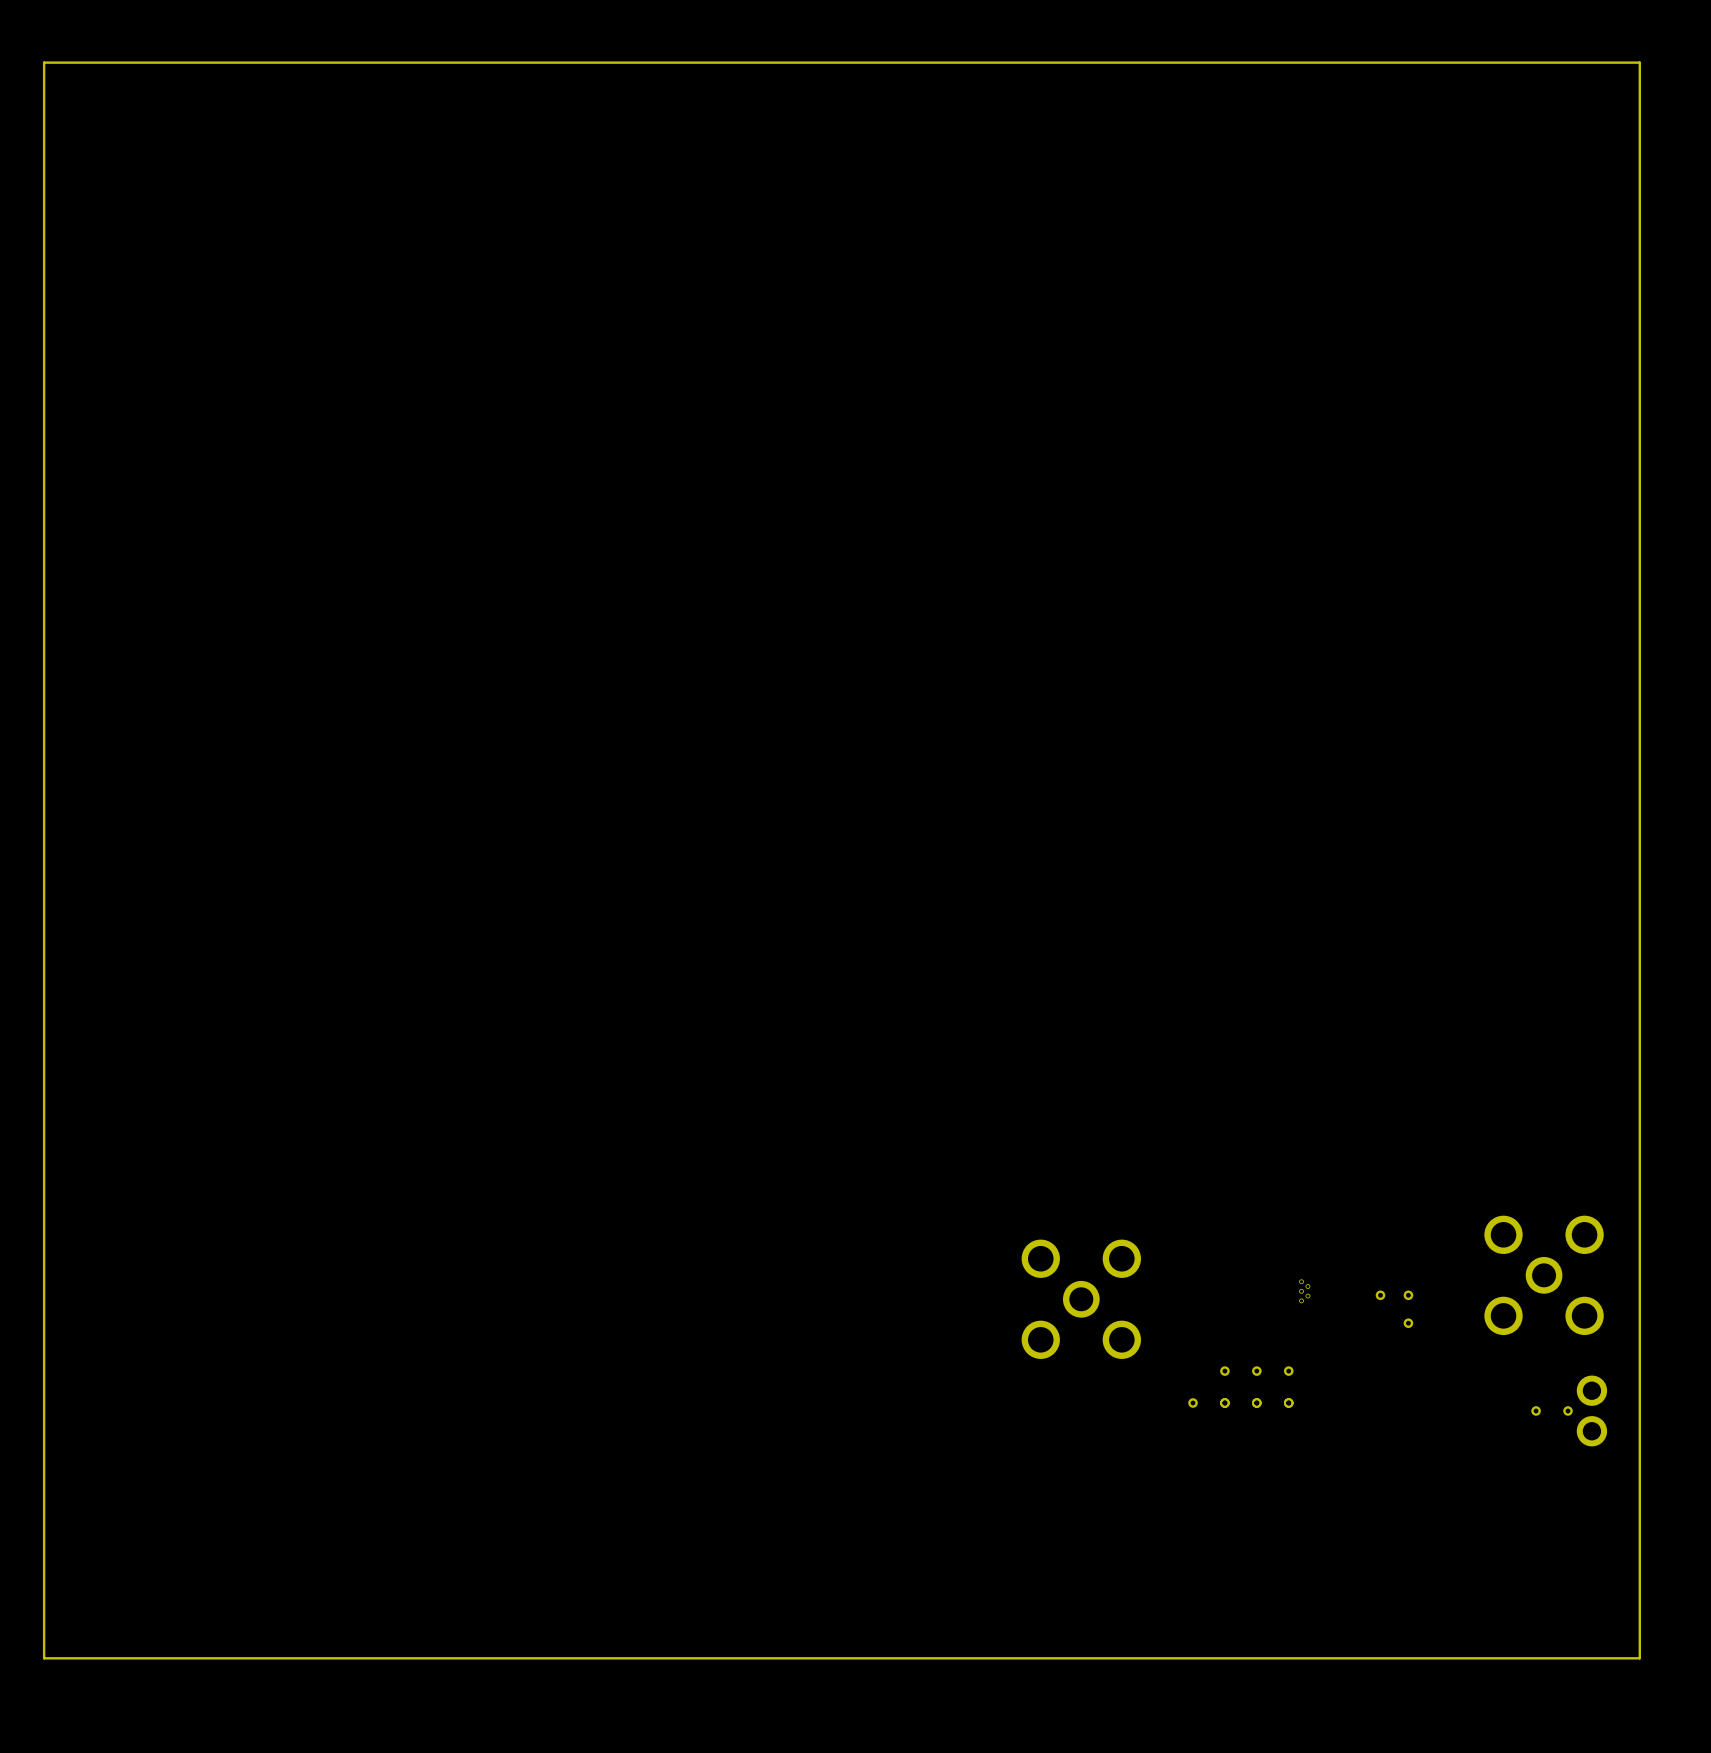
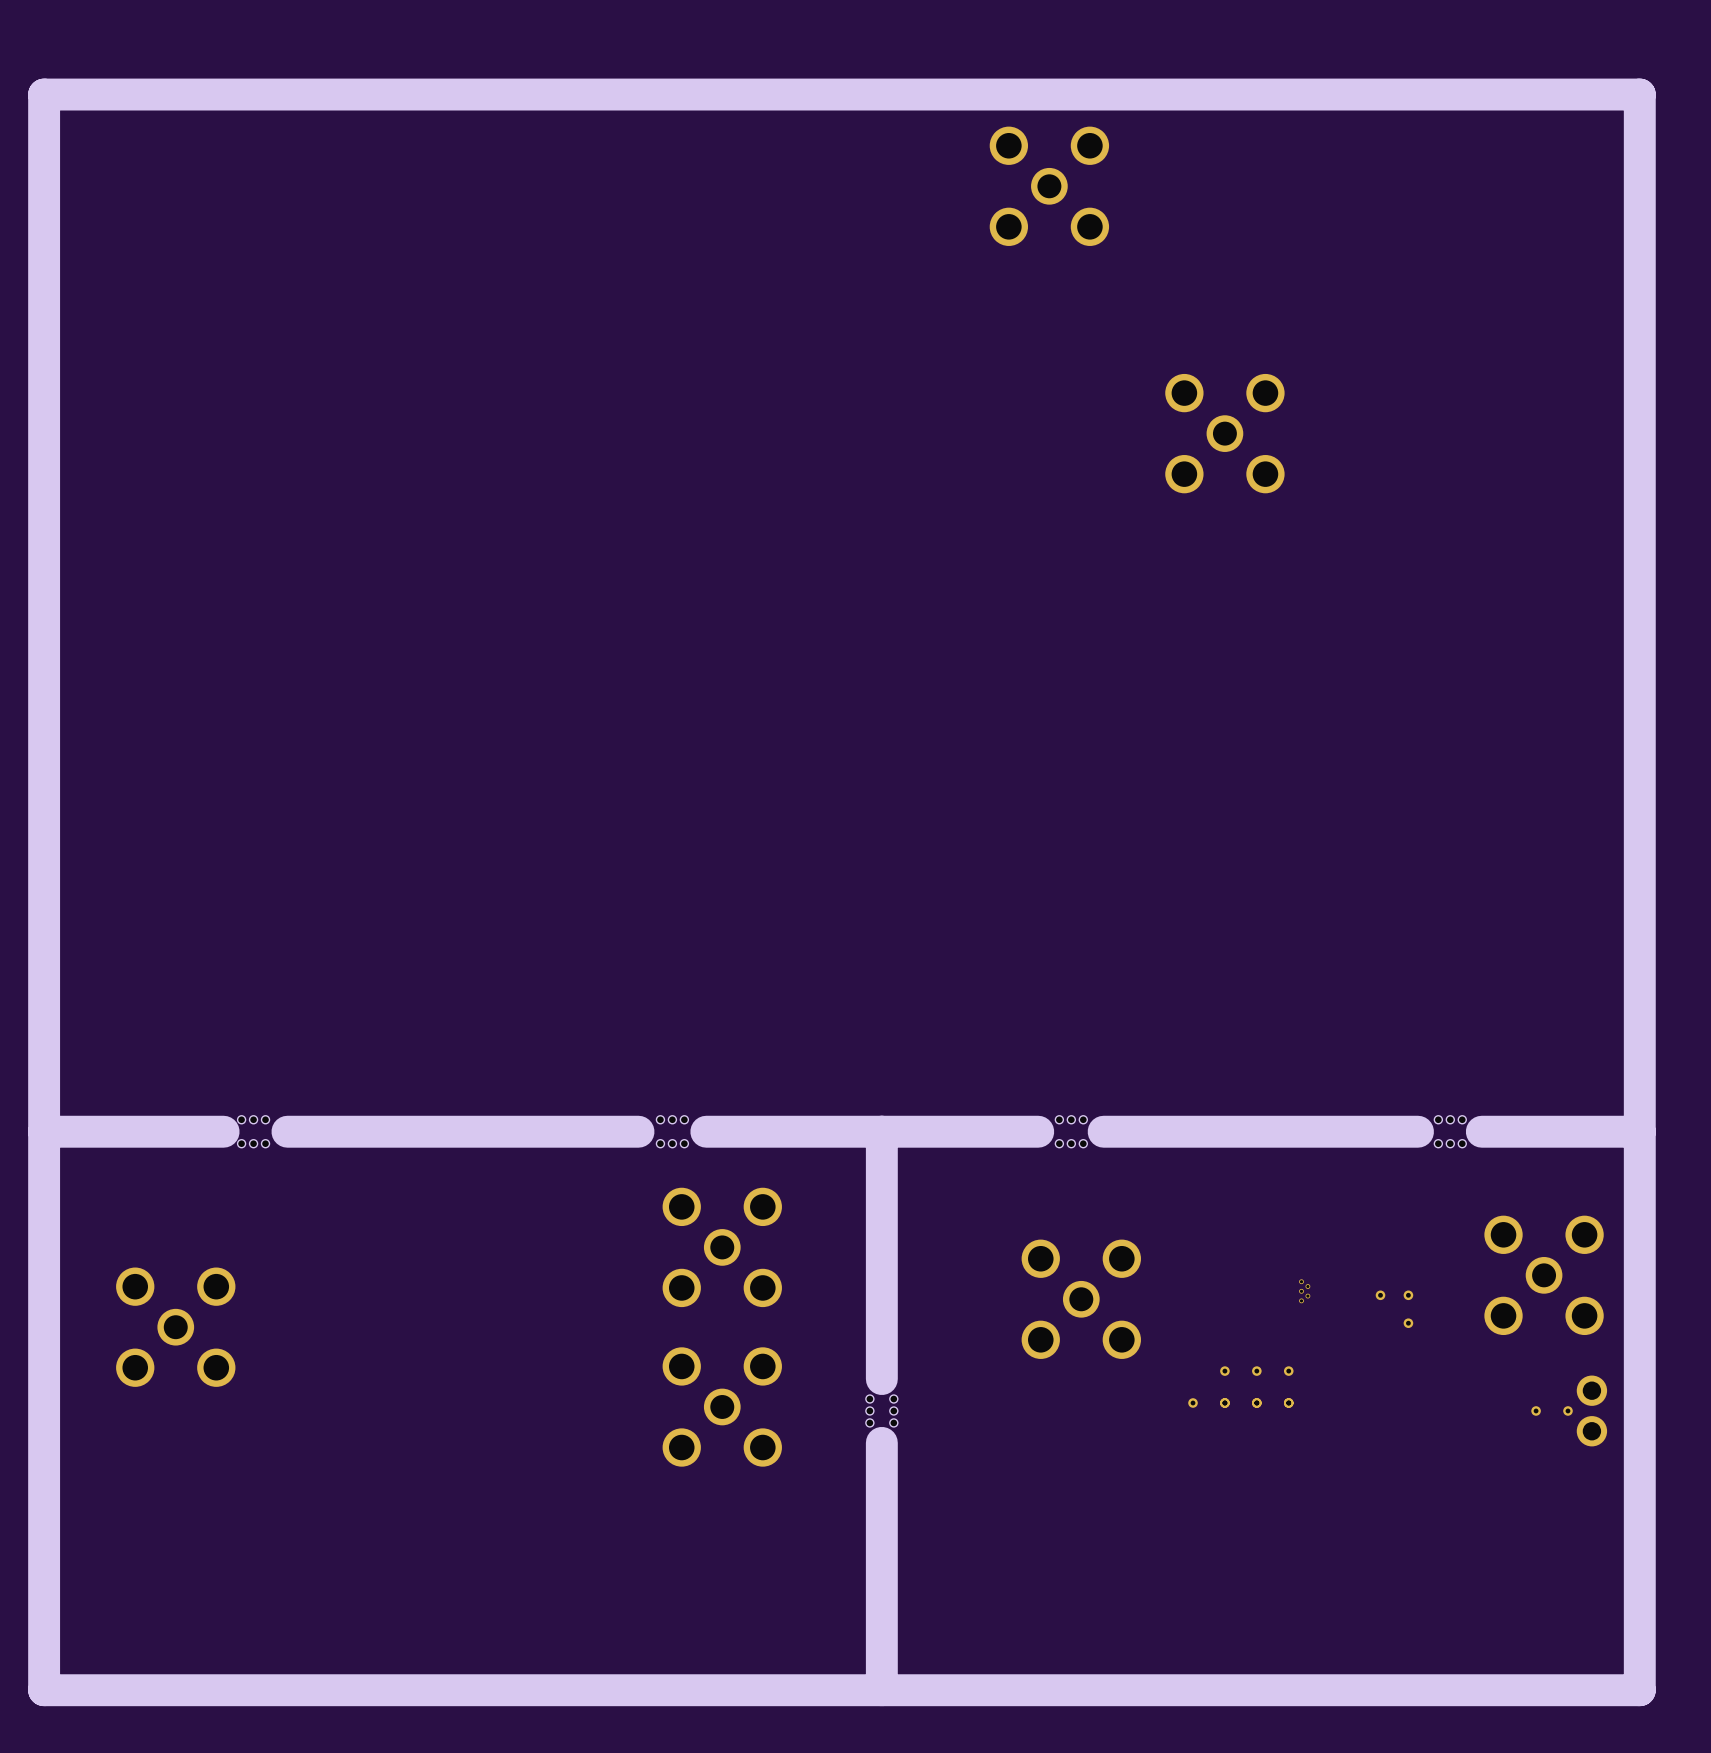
board edge width: thin (44, 94) (44, 1658) -> thick (44, 94) (44, 1658)
board edge: (1639, 94) (1639, 62) (44, 62) (44, 94) -> (1639, 94) (44, 94)
board edge width: thin (1639, 94) (1639, 1658) -> thick (1639, 94) (1639, 1658)
part: none -> (1049, 186)
part: none -> (1224, 433)
board edge: none -> (223, 1131) (44, 1131)
part: none -> (253, 1131)
board edge: none -> (638, 1131) (287, 1131)
part: none -> (672, 1131)
board edge: none -> (881, 1131) (881, 1379)
board edge: none -> (1038, 1131) (706, 1131)
part: none -> (1071, 1131)
board edge: none -> (1418, 1131) (1103, 1131)
part: none -> (1450, 1131)
board edge: none -> (1639, 1131) (1481, 1131)
part: none -> (722, 1247)
part: none -> (175, 1327)
part: none -> (722, 1406)
part: none -> (881, 1410)
board edge: none -> (881, 1442) (881, 1690)
board edge: (1639, 1658) (44, 1658) -> (1639, 1658) (1639, 1690) (44, 1690) (44, 1658)

